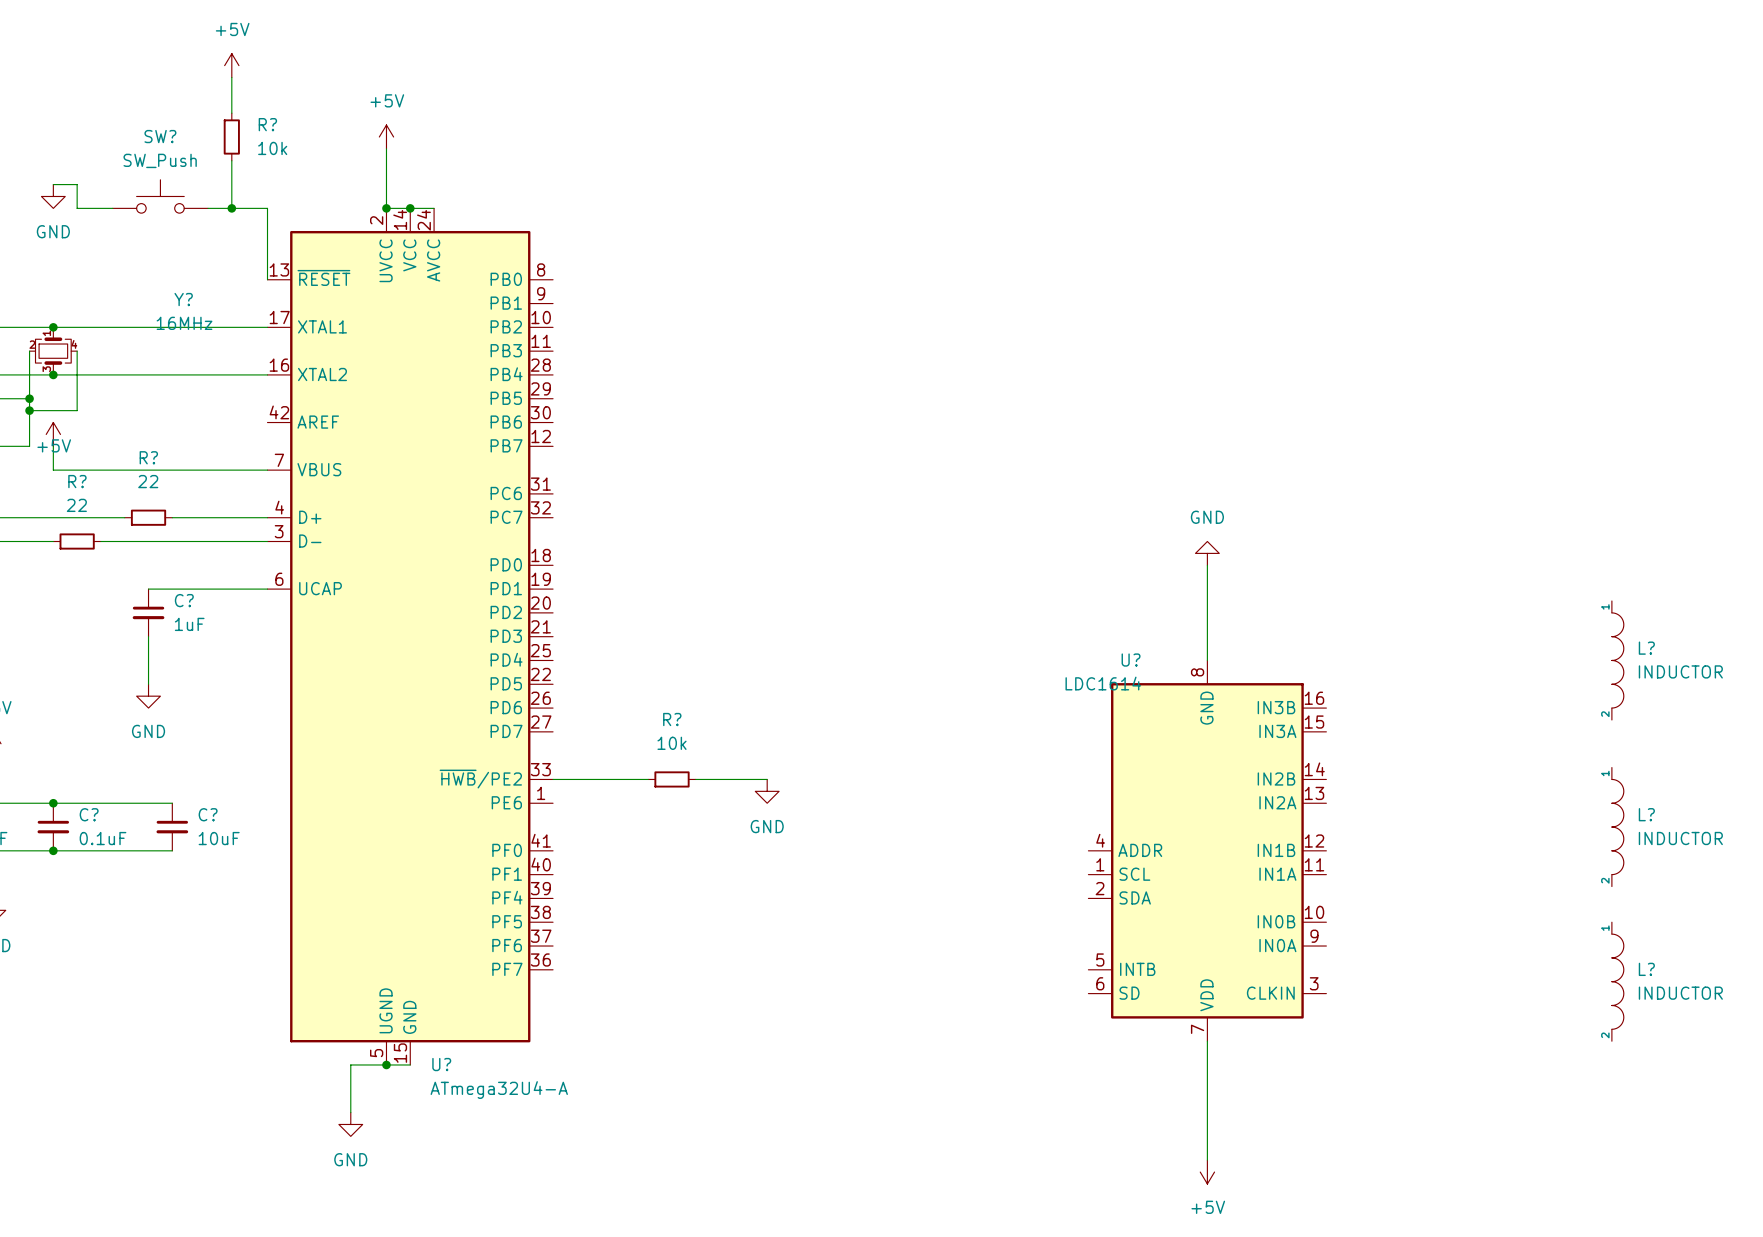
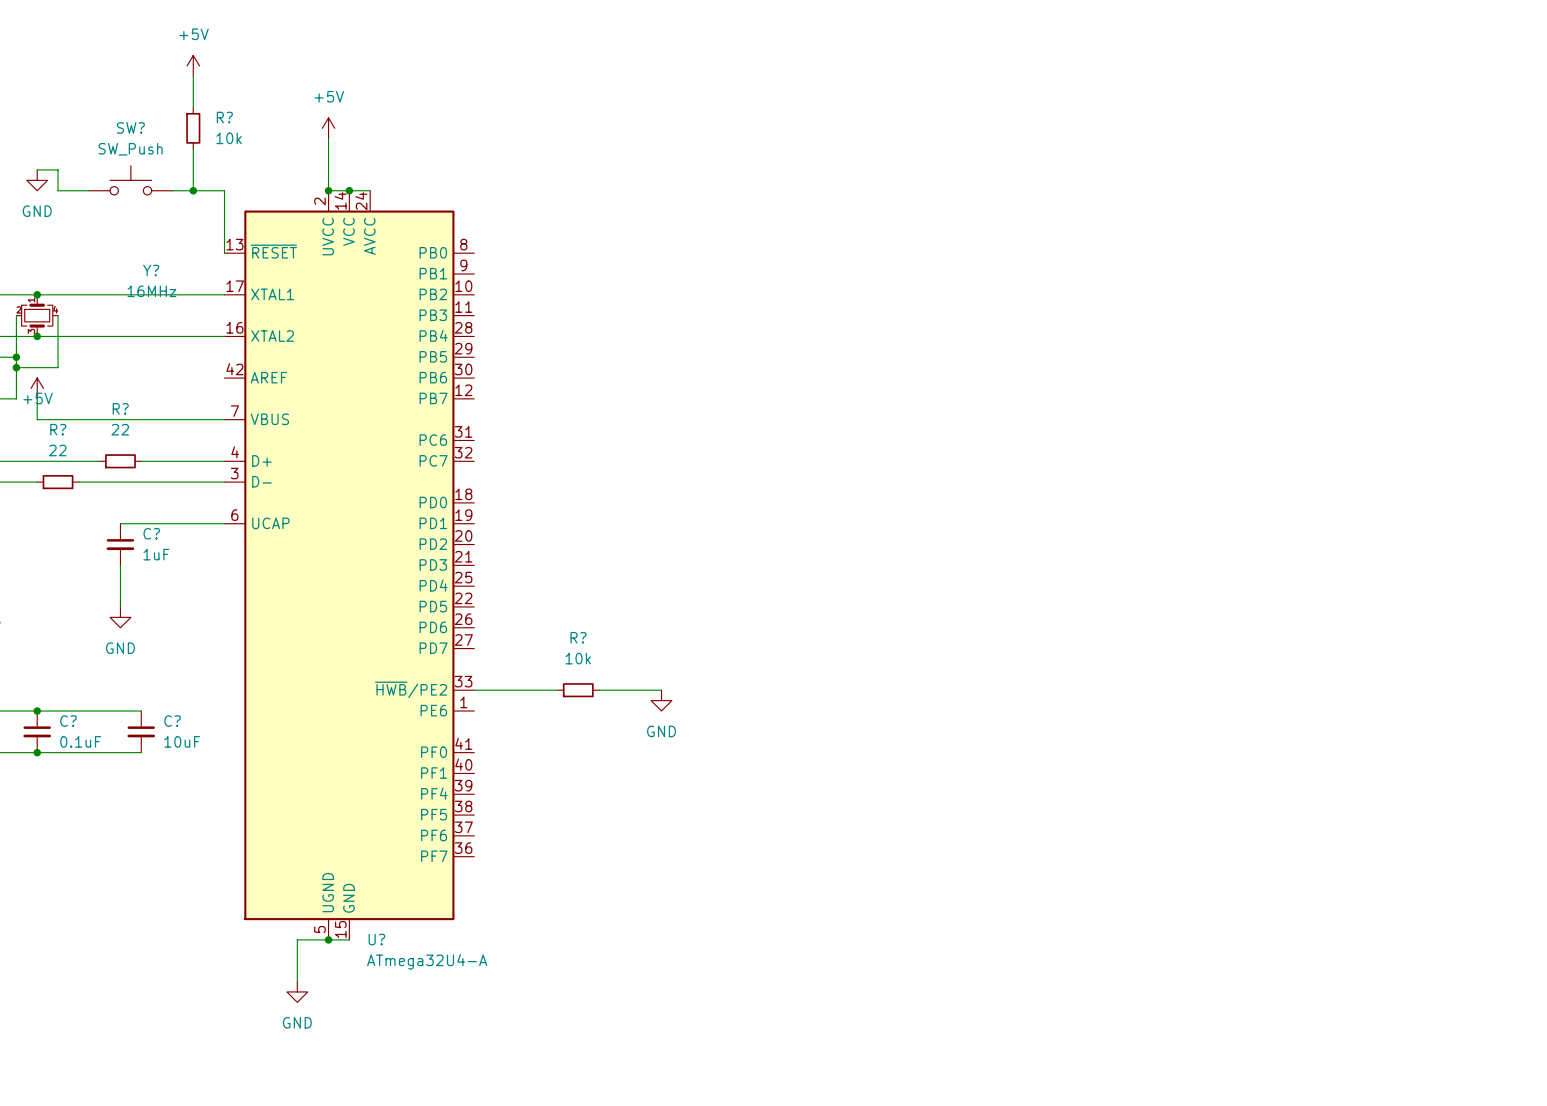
power symbol: GND (1207, 553) -> none
wire: (1207, 565) (1207, 660) -> none
L?: INDUCTOR (1617, 660) -> none
L?: INDUCTOR (1617, 827) -> none
U?: LDC1614 (1207, 850) -> none
L?: INDUCTOR (1617, 981) -> none
wire: (1207, 1041) (1207, 1160) -> none
power symbol: +5V (1207, 1172) -> none

